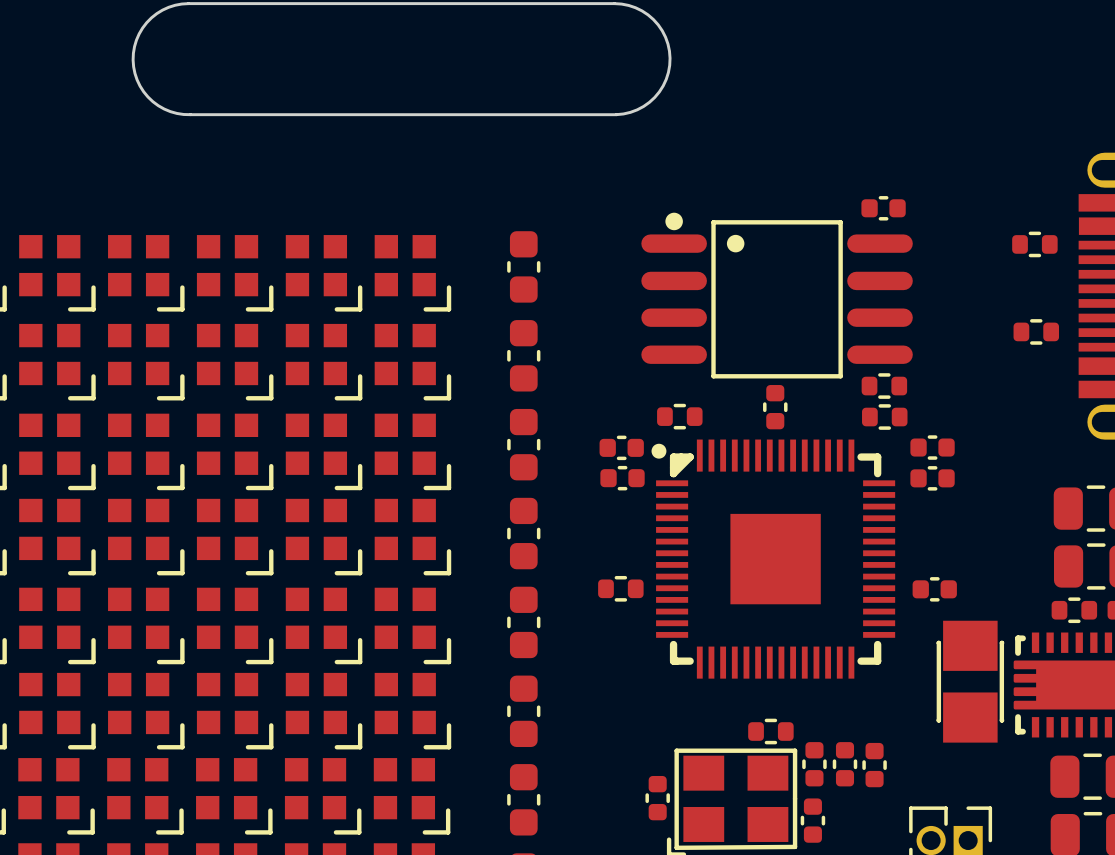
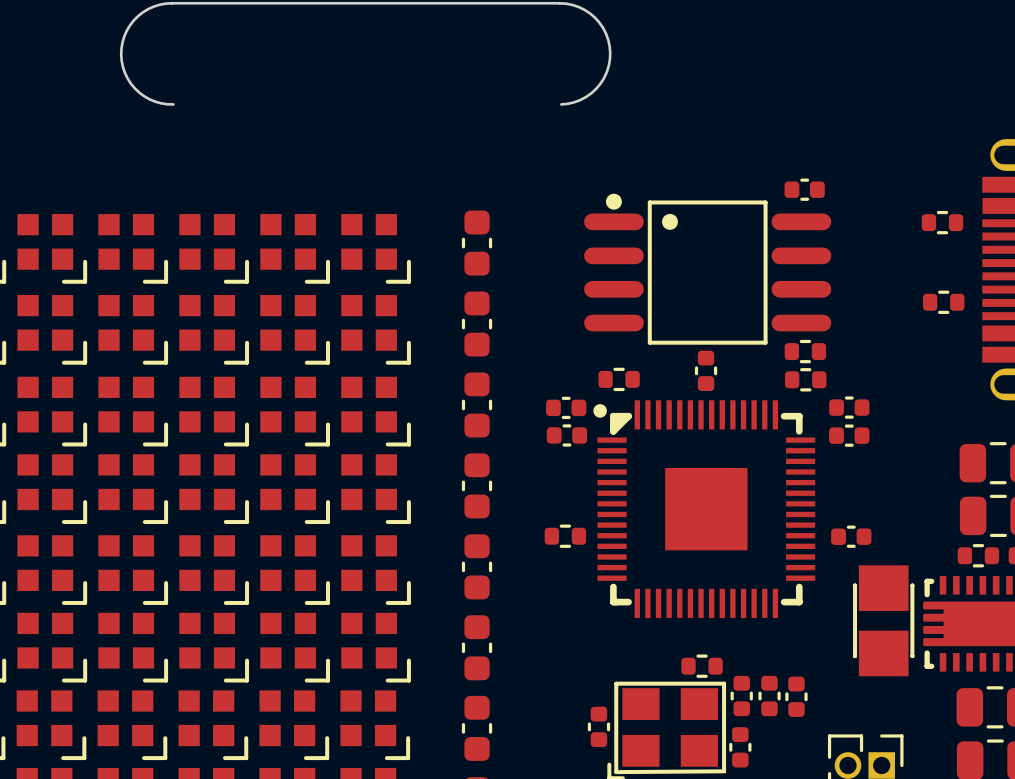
board edge: (190, 114) (616, 114) -> none

